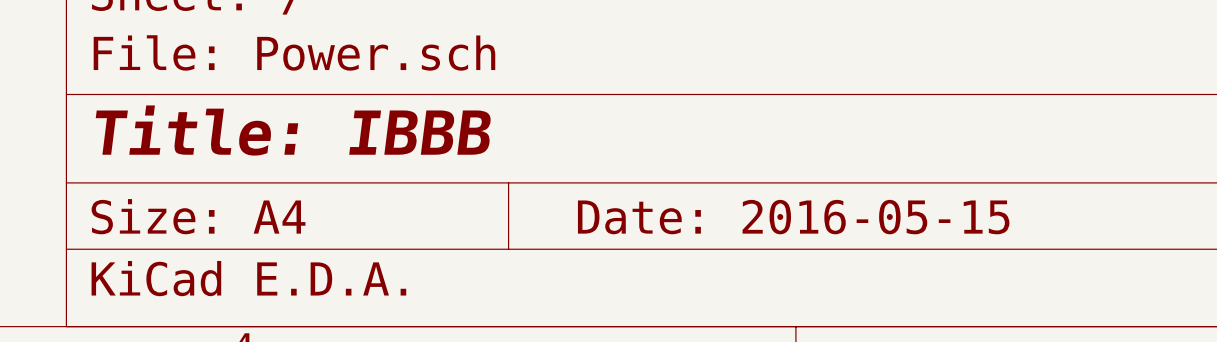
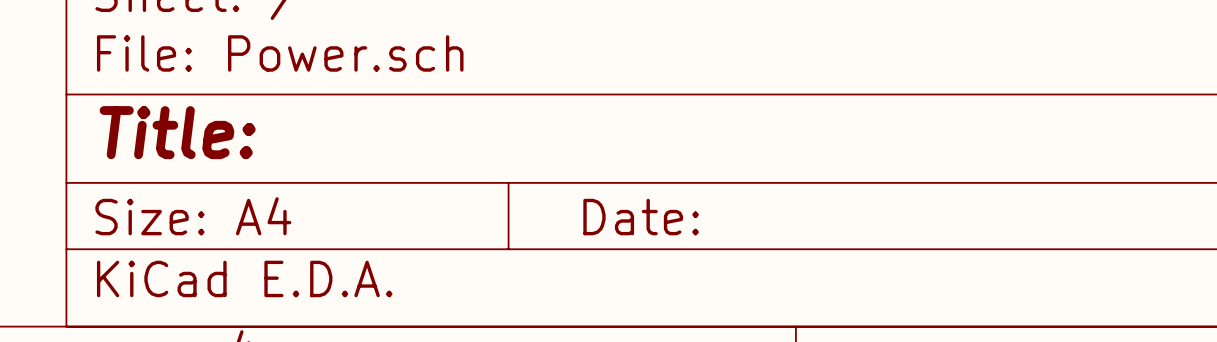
title block: Title: IBBB (293, 130) -> Title: (177, 132)
title block: Date: 2016-05-15 (793, 217) -> Date: (641, 217)

